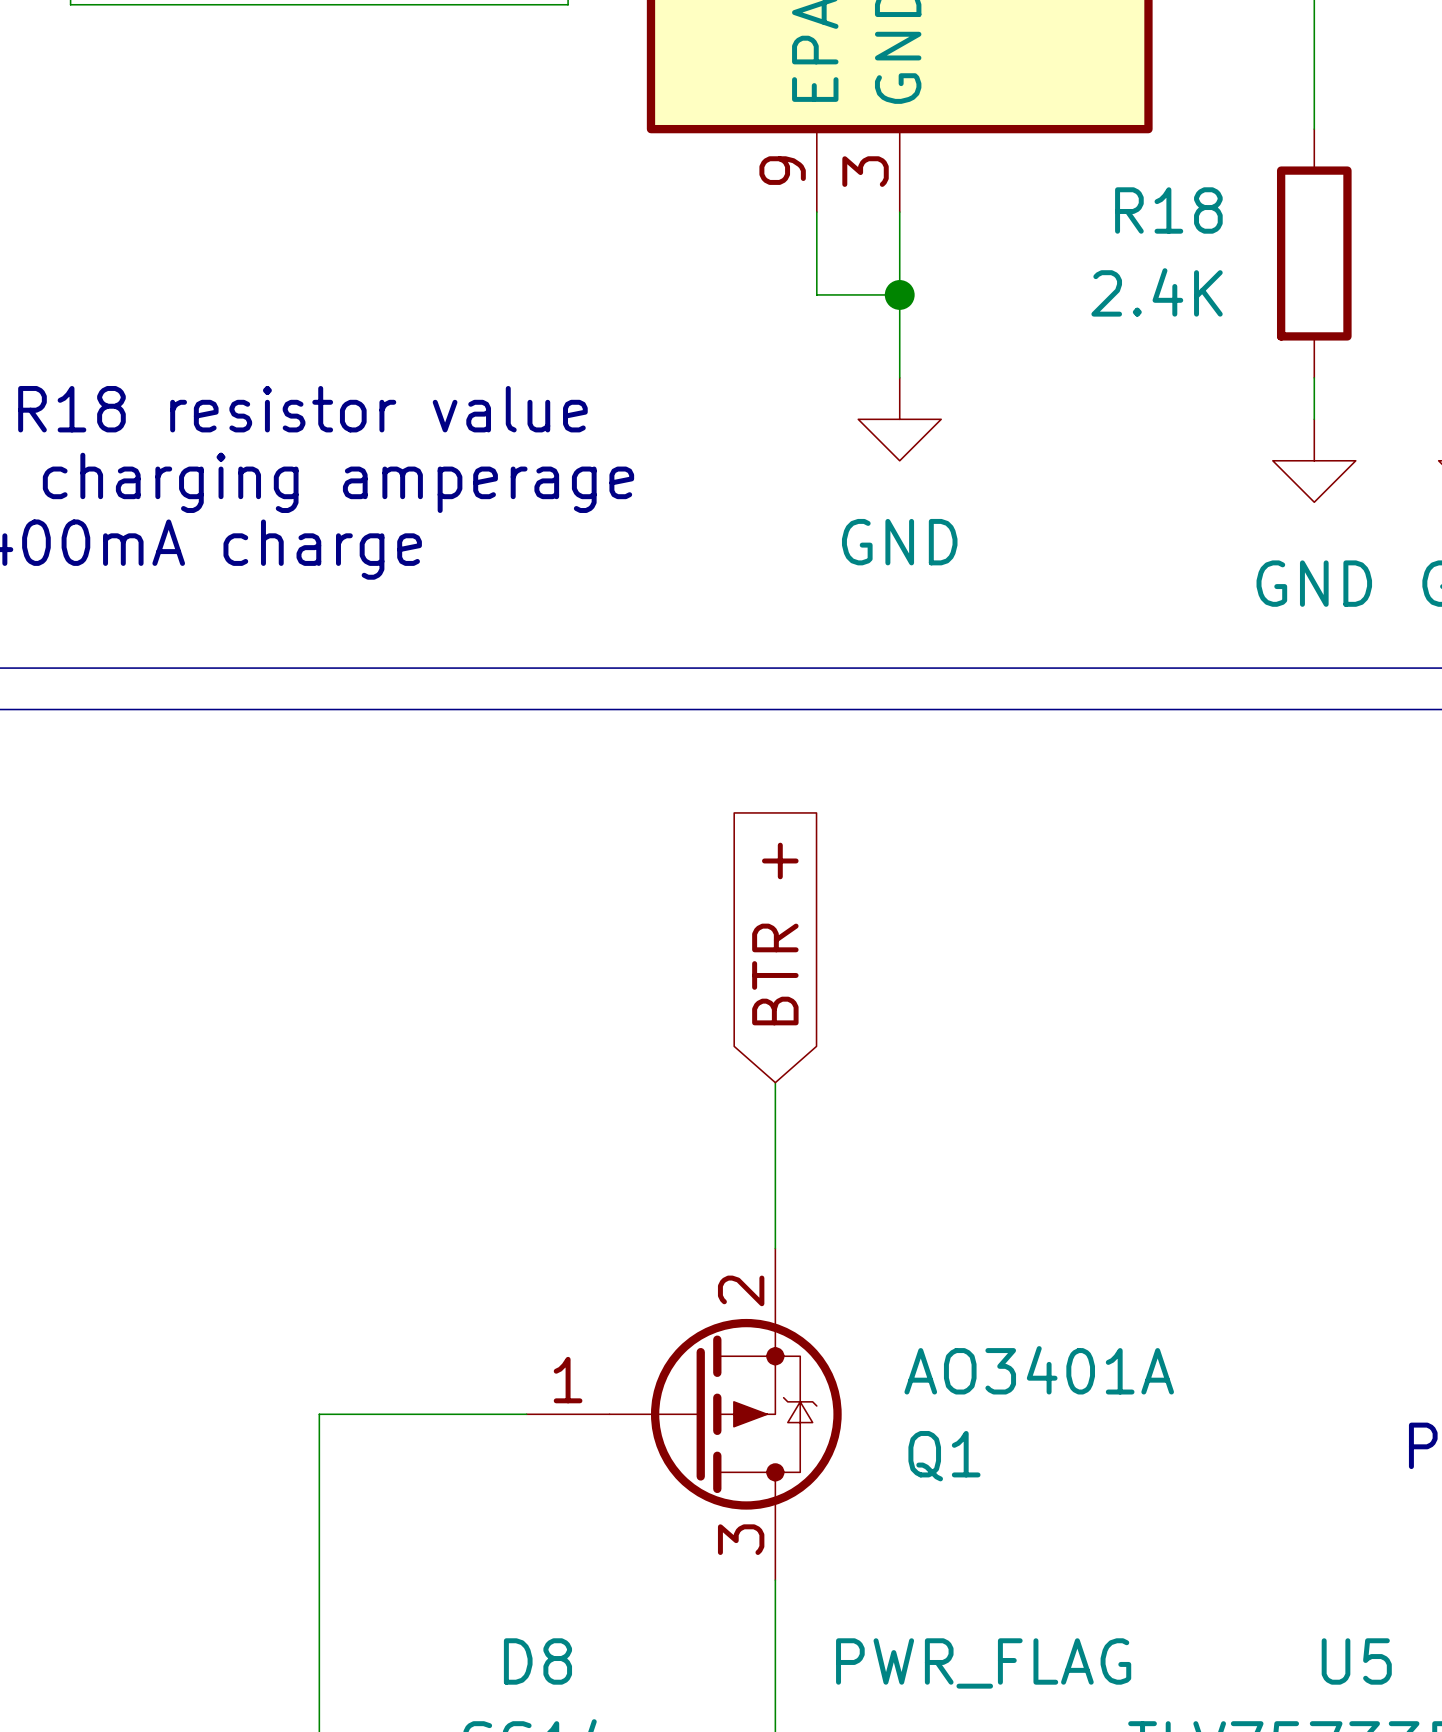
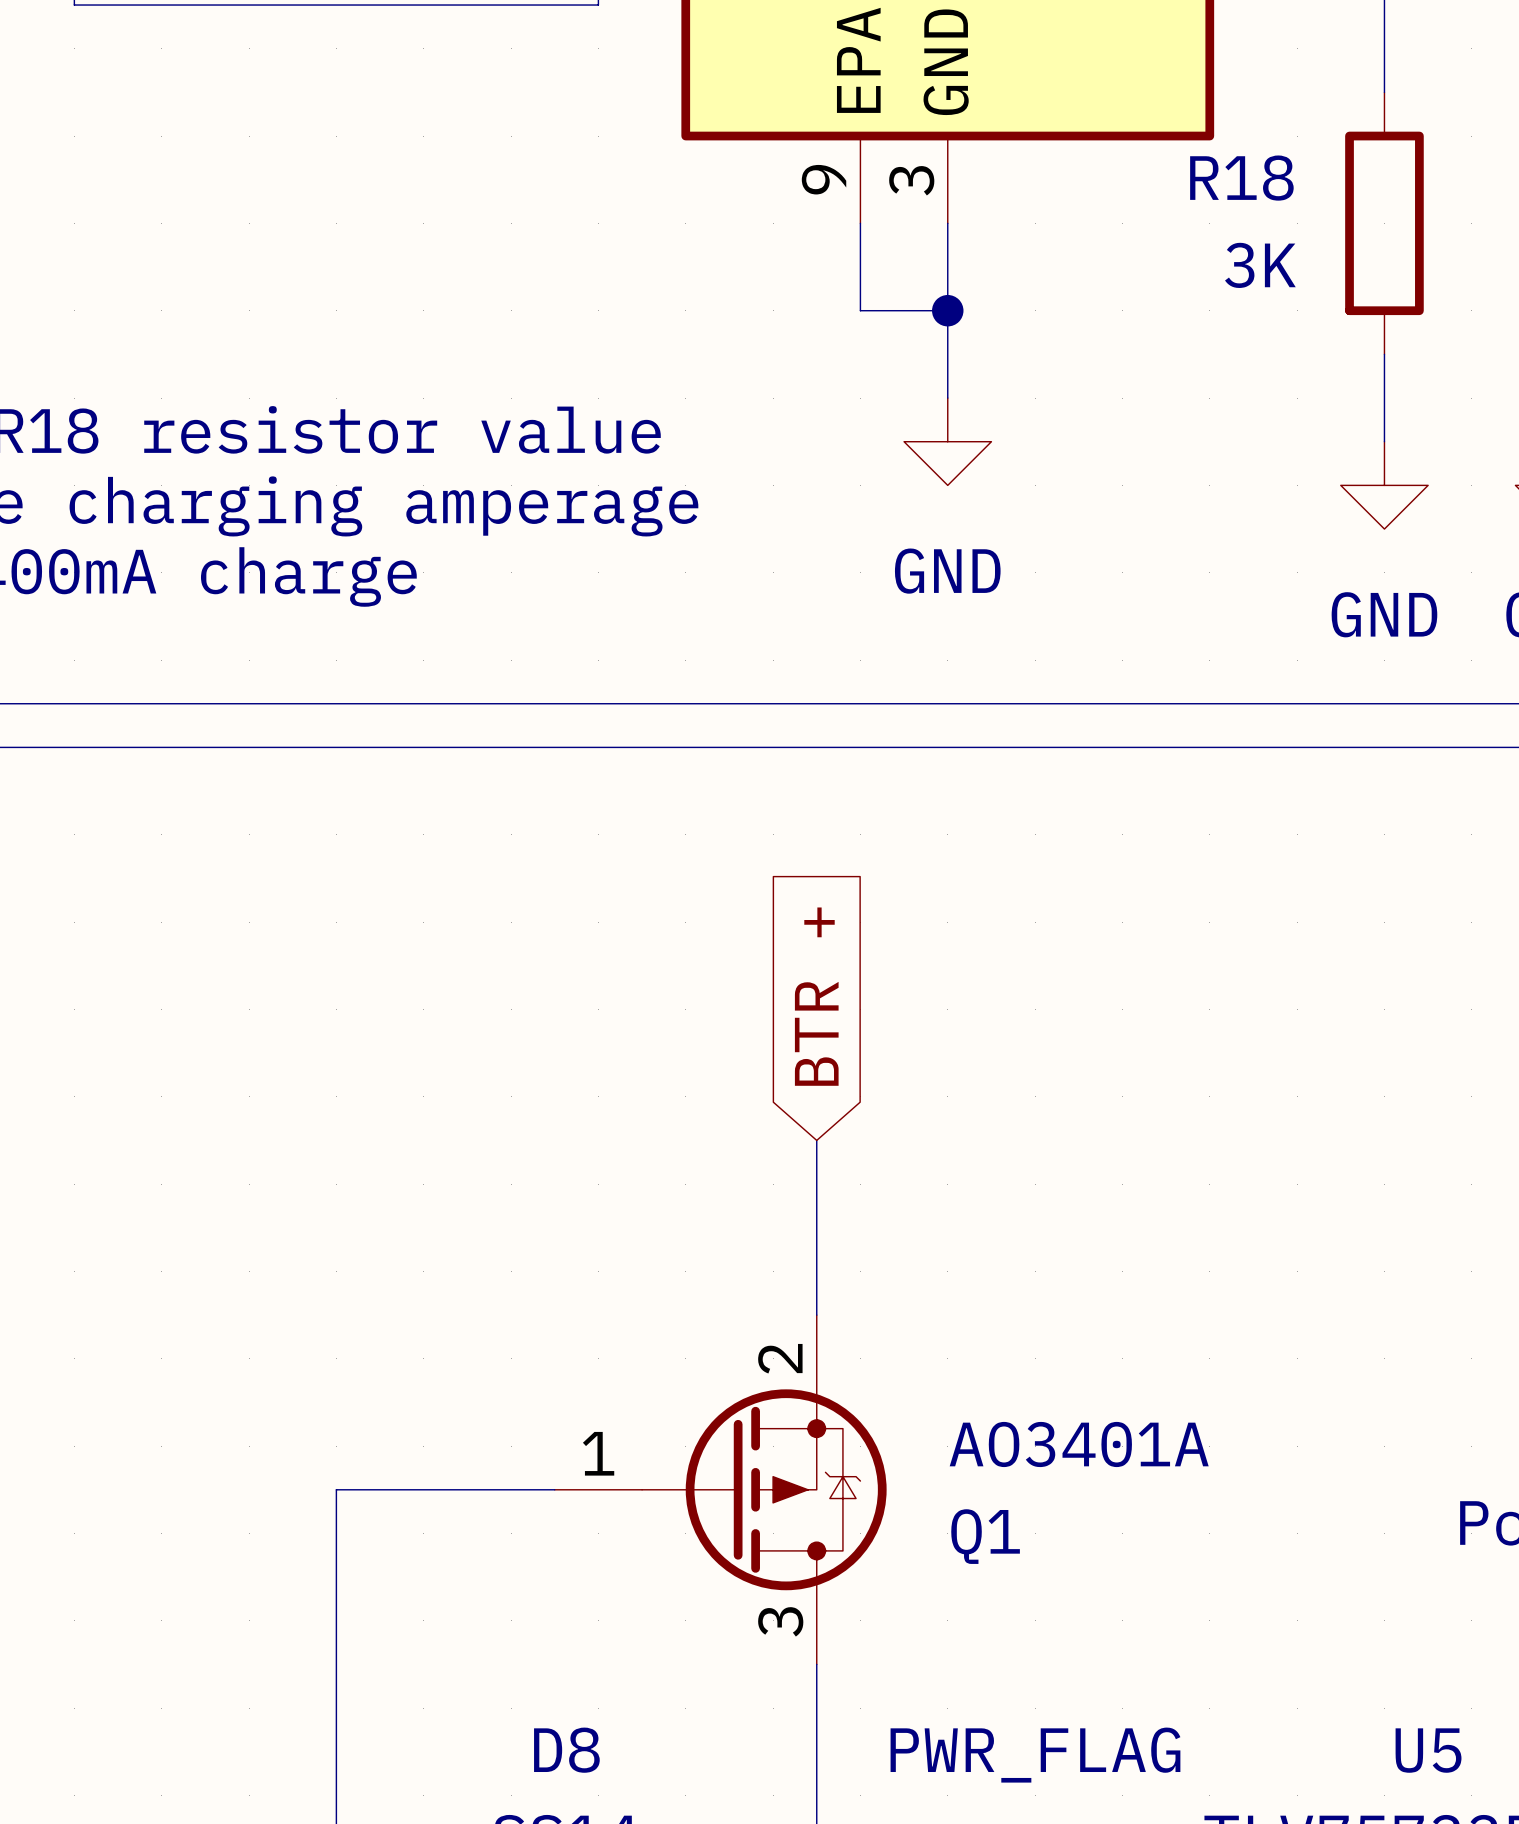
R18 position: (1314, 253) -> (1384, 223)
R18 value: 2.4K (1157, 292) -> 3K (1260, 265)

